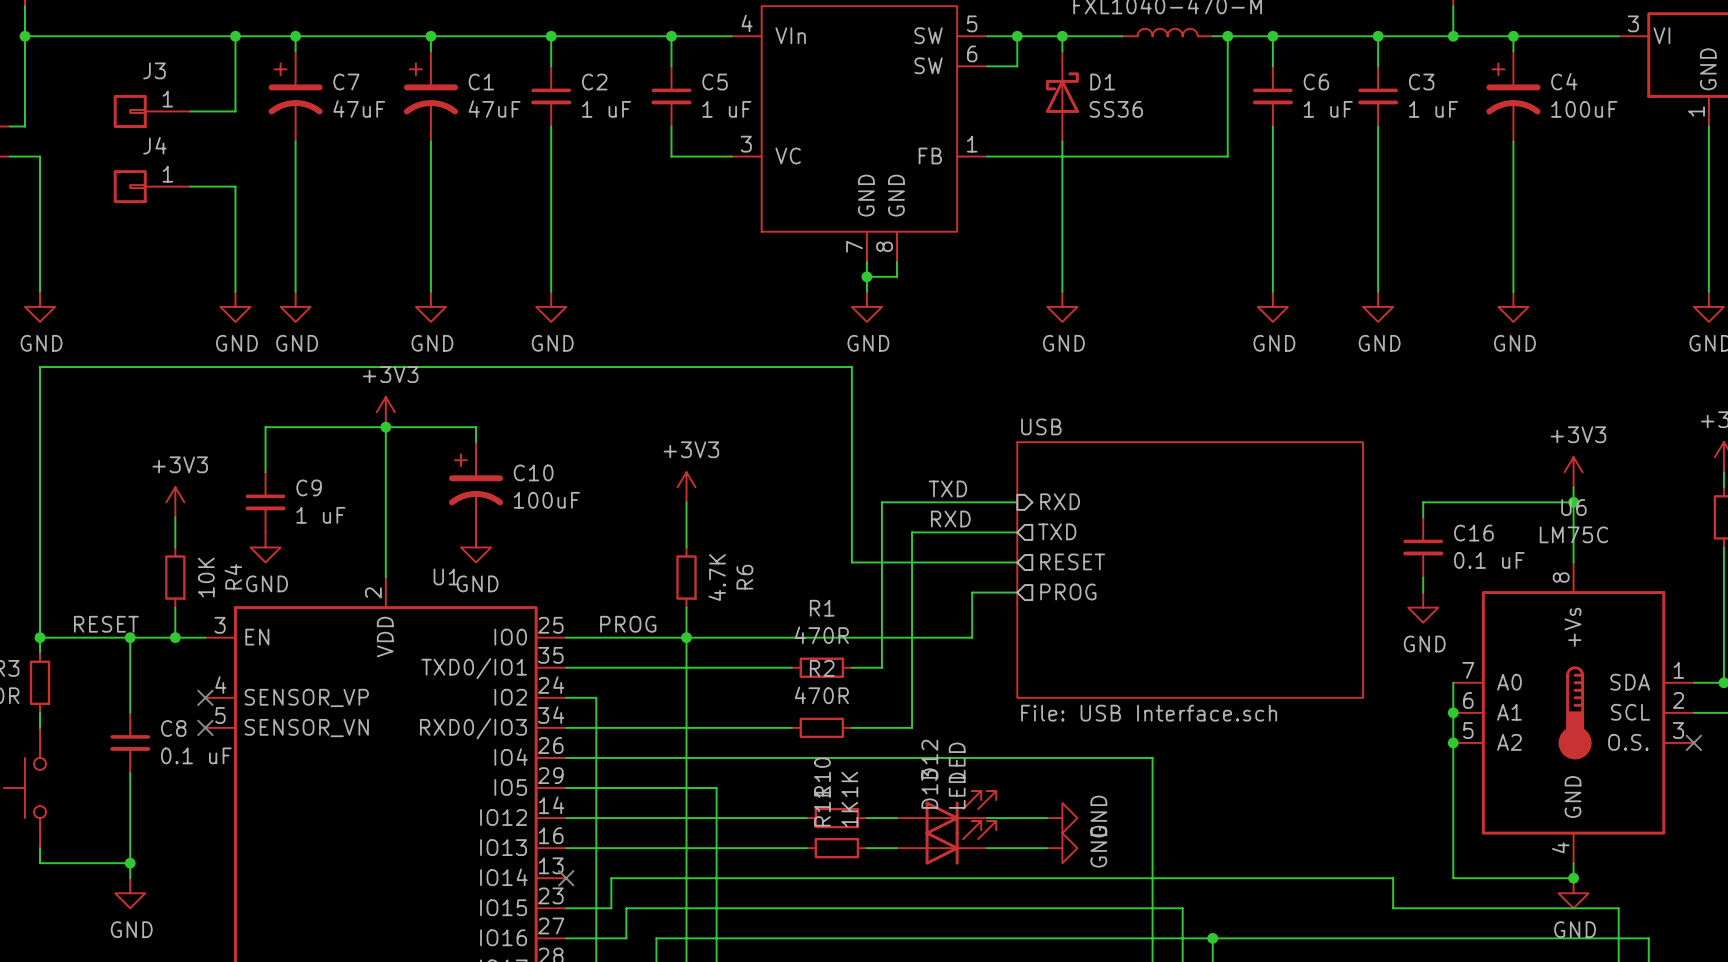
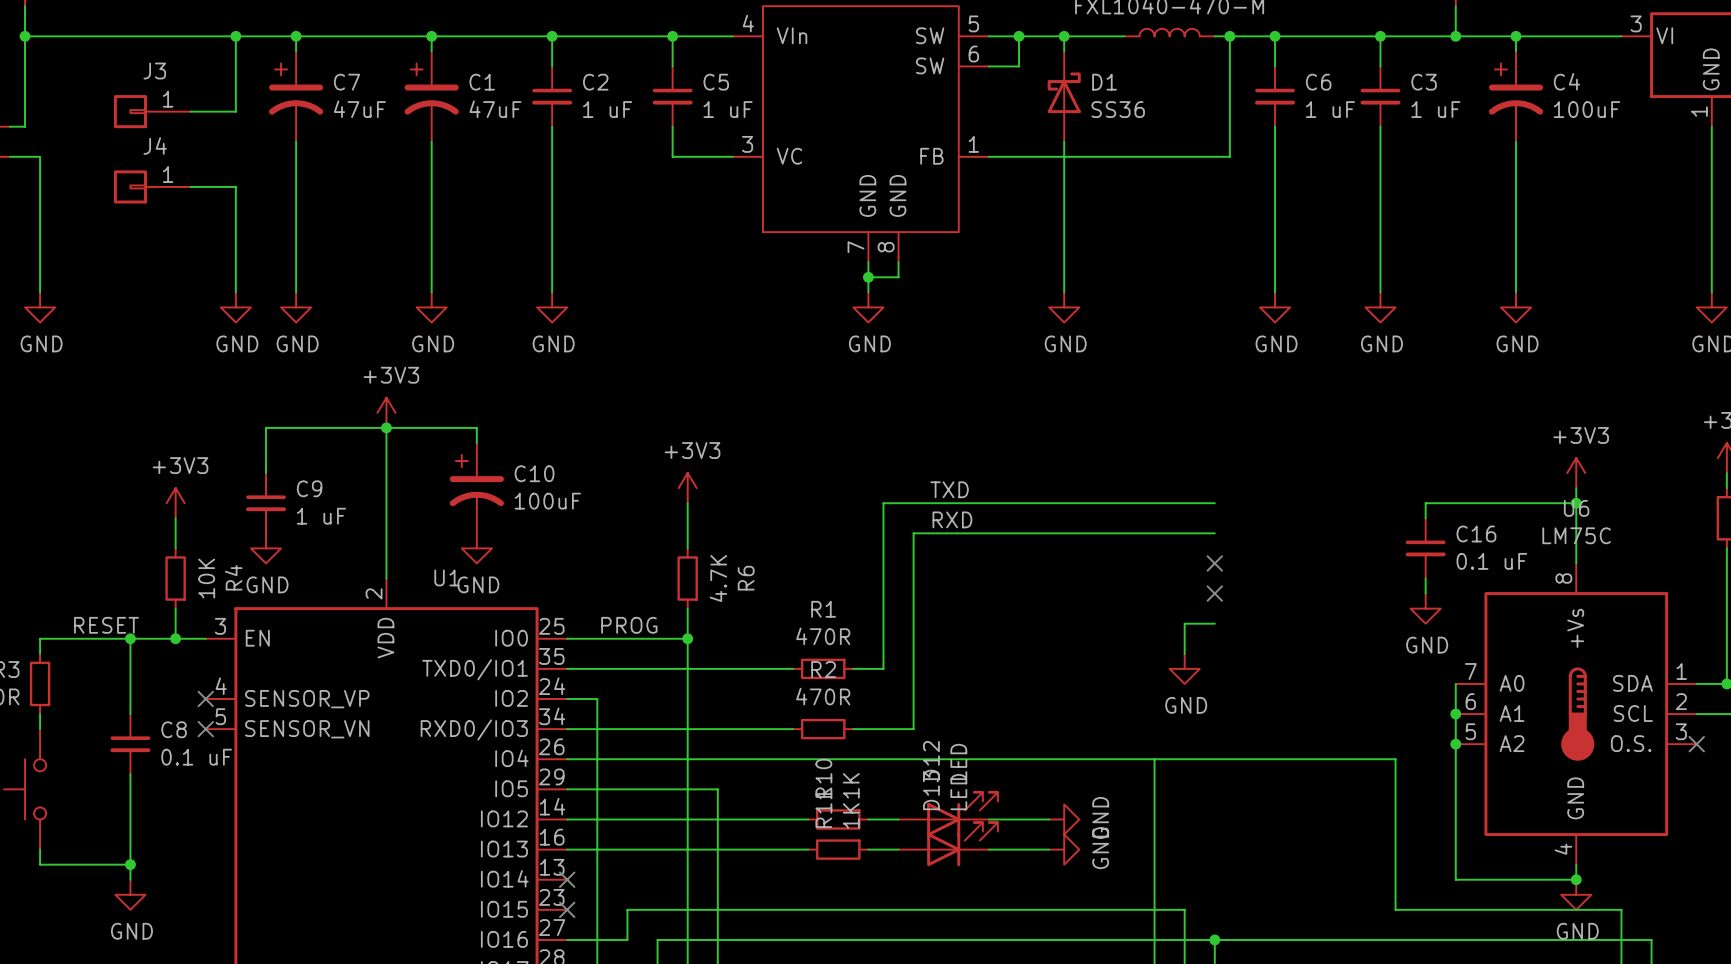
sheet pin: RXD (1060, 501) -> none
wire: none -> (1019, 503) (1214, 503)
sheet pin: TXD (1057, 531) -> none
wire: none -> (1019, 533) (1214, 533)
sheet pin: RESET (1072, 561) -> none
wire: (1017, 562) (851, 562) (851, 367) (40, 367) (40, 637) -> none
no-connect mark: none -> (1214, 563)
sheet USB: File: USB Interface.sch (1190, 570) -> none
wire: (1017, 592) (972, 592) (972, 637) (686, 637) -> none
sheet pin: PROG (1068, 592) -> none
no-connect mark: none -> (1214, 593)
wire: none -> (1214, 623) (1184, 623) (1184, 653)
junction: (40, 637) -> none
power symbol: none -> GND (1184, 668)
wire: (1393, 878) (611, 878) (611, 908) (566, 908) -> (1395, 879) (1395, 759) (1154, 759)
no-connect mark: none -> (567, 909)

